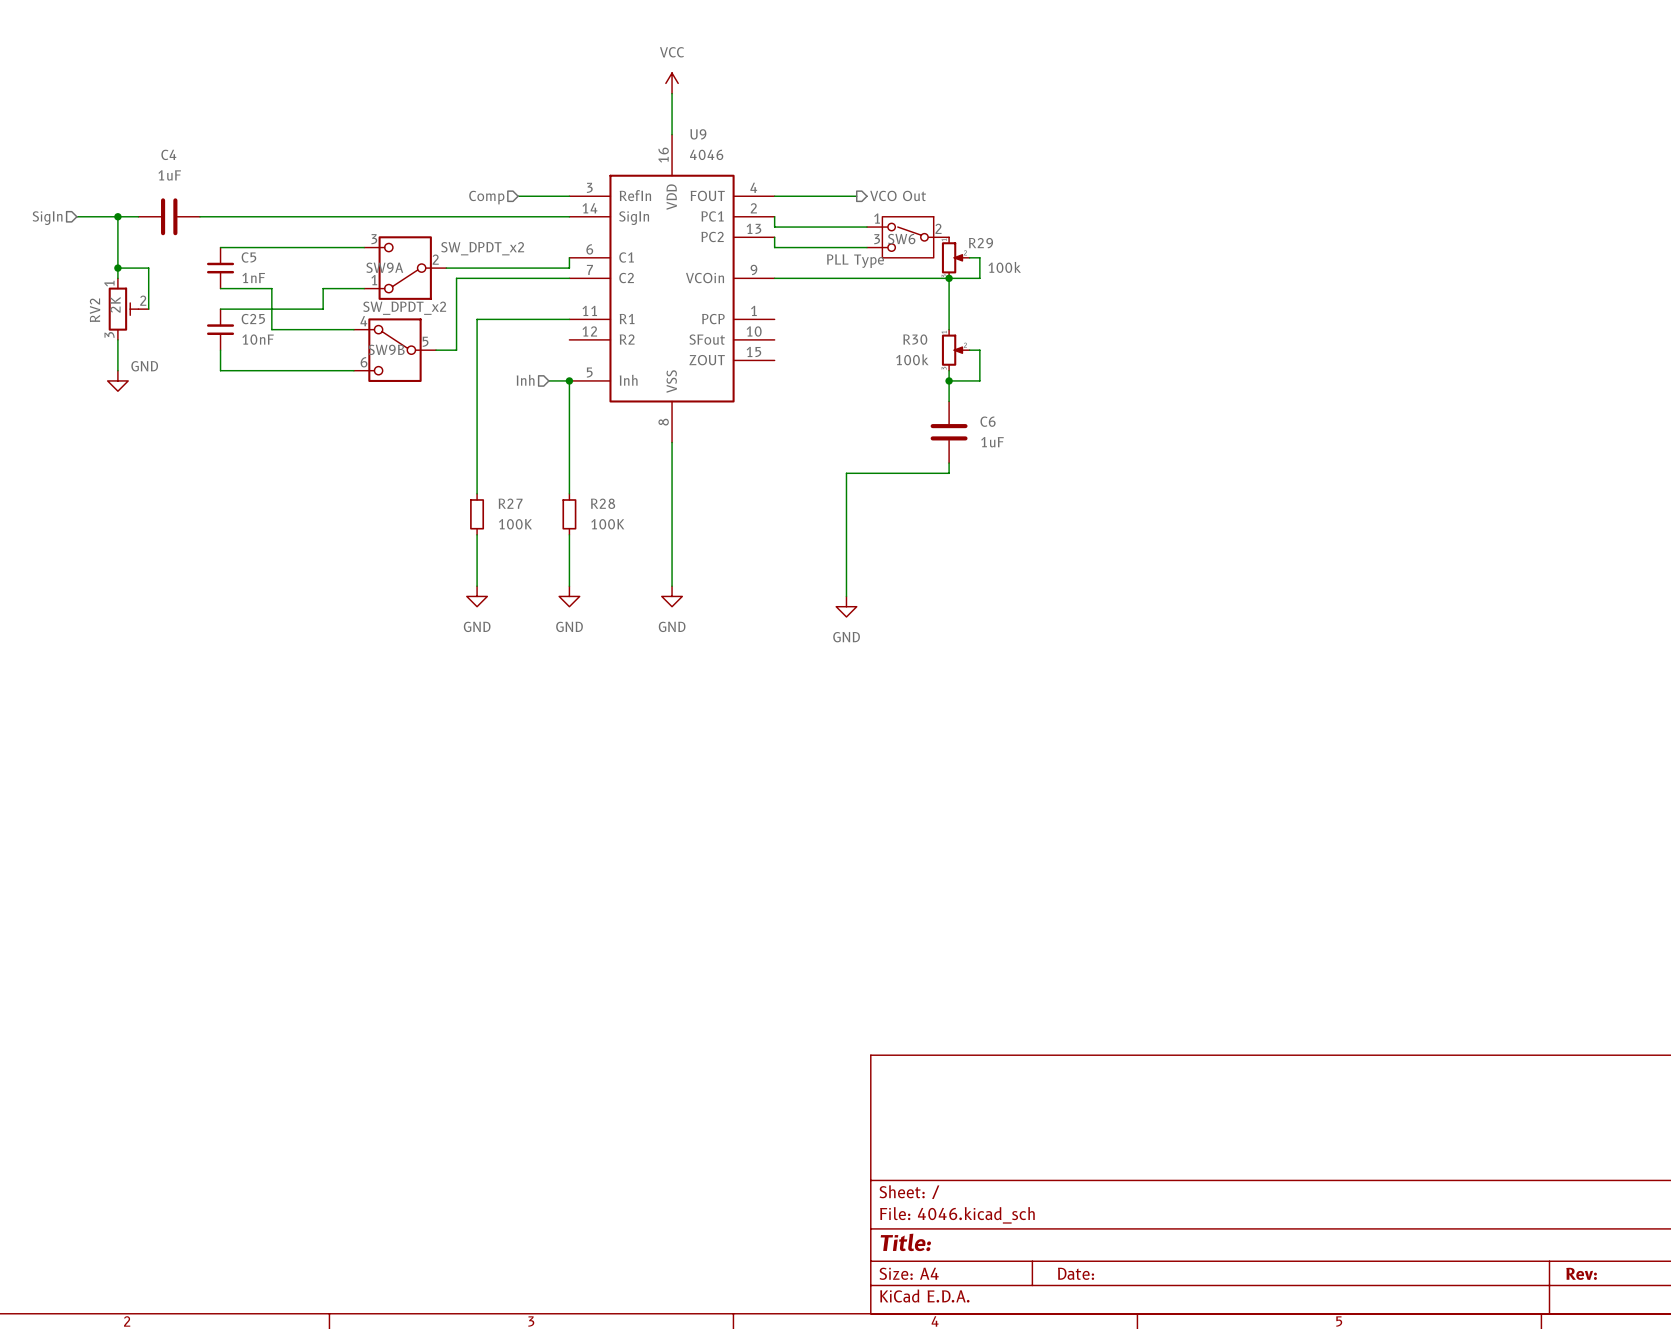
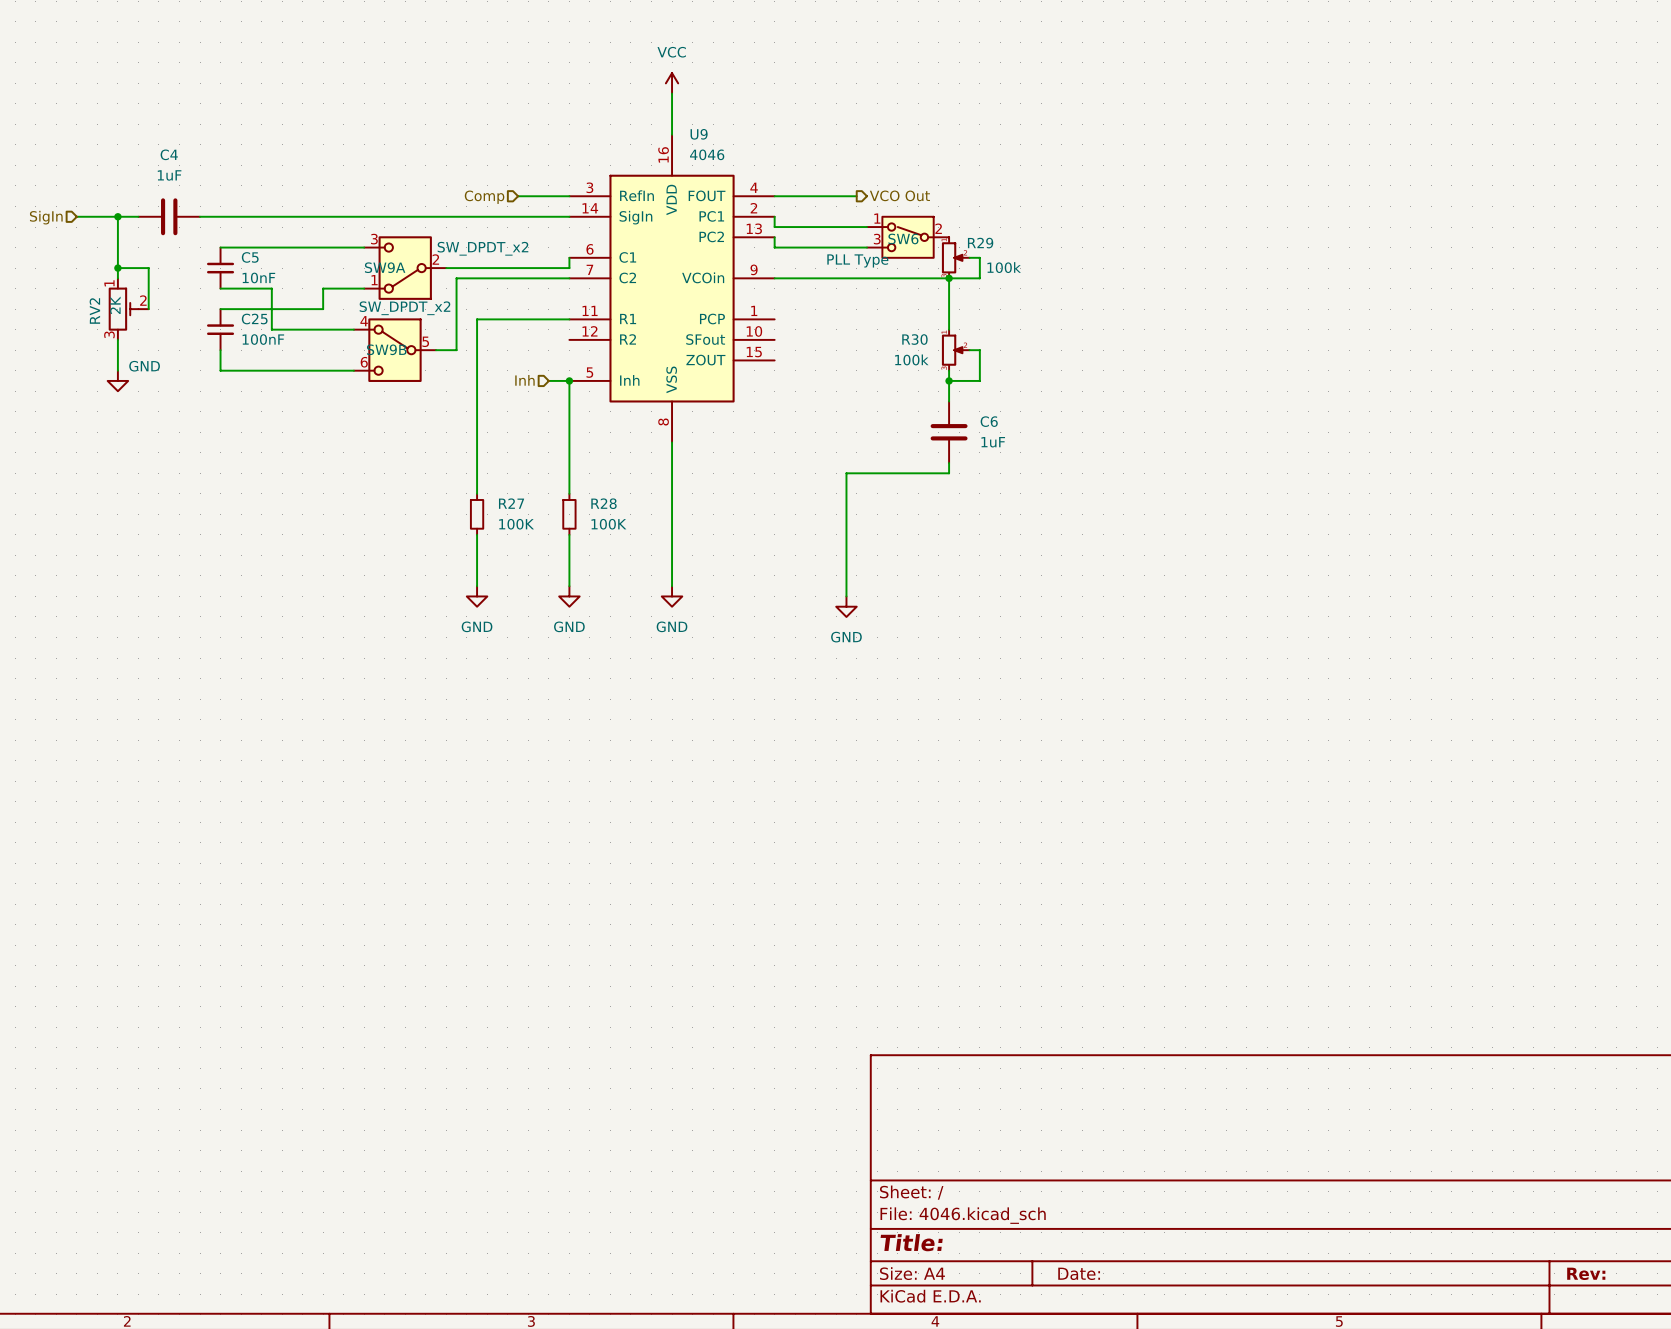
C5 value: 1nF (253, 277) -> 10nF (258, 277)
C25 value: 10nF (258, 339) -> 100nF (263, 339)

